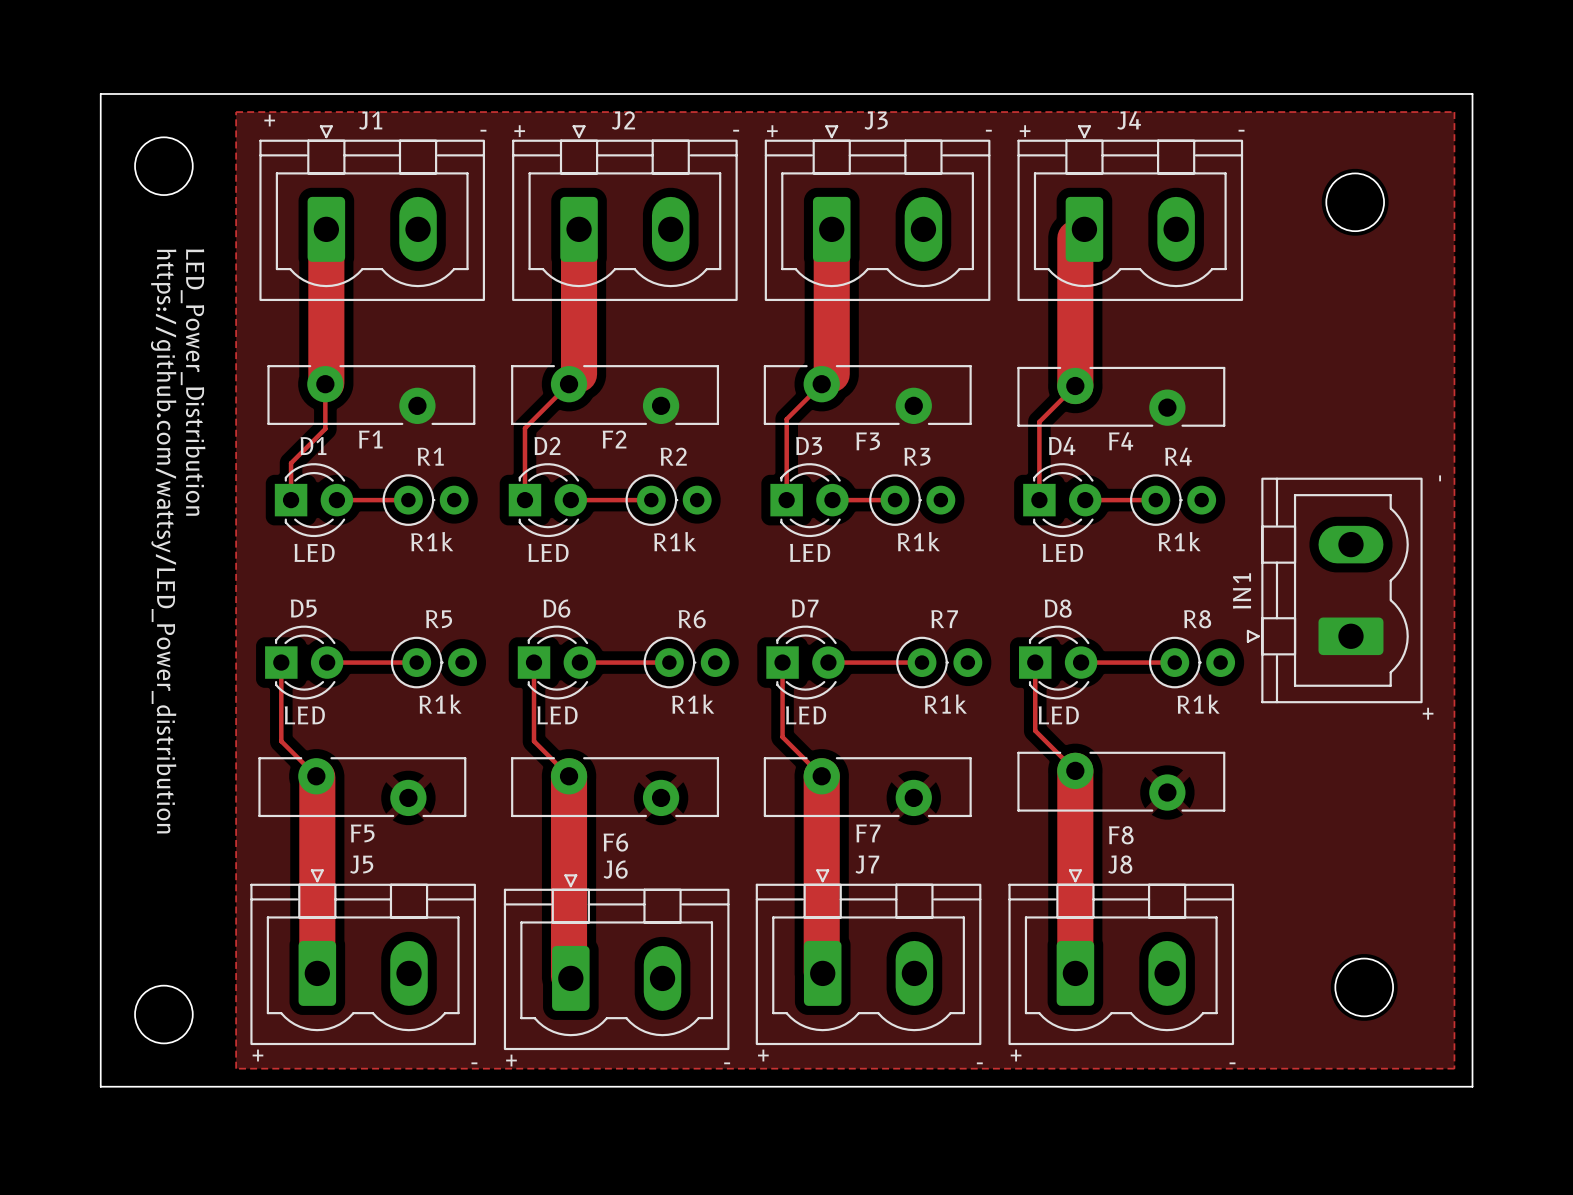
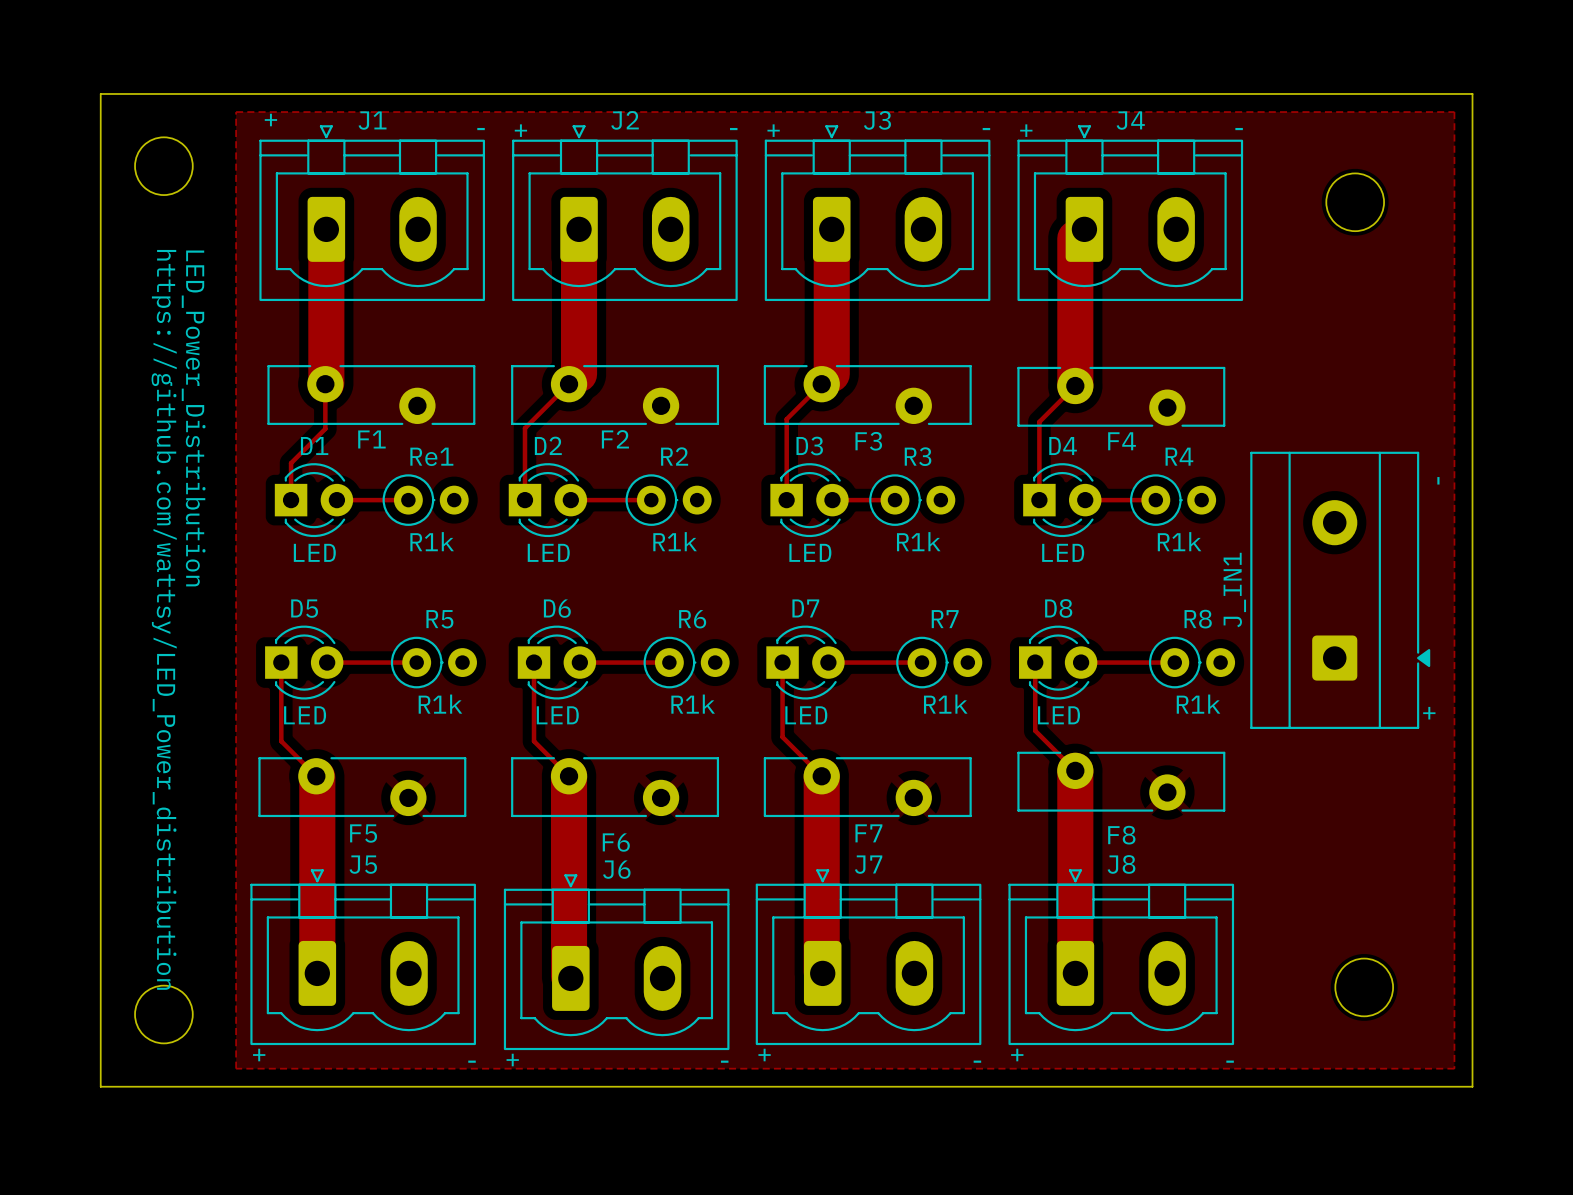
R1 name: R1 (430, 456) -> Re1 (431, 456)
IN1: (1334, 590) -> none
J_IN1: none -> (1340, 590)

